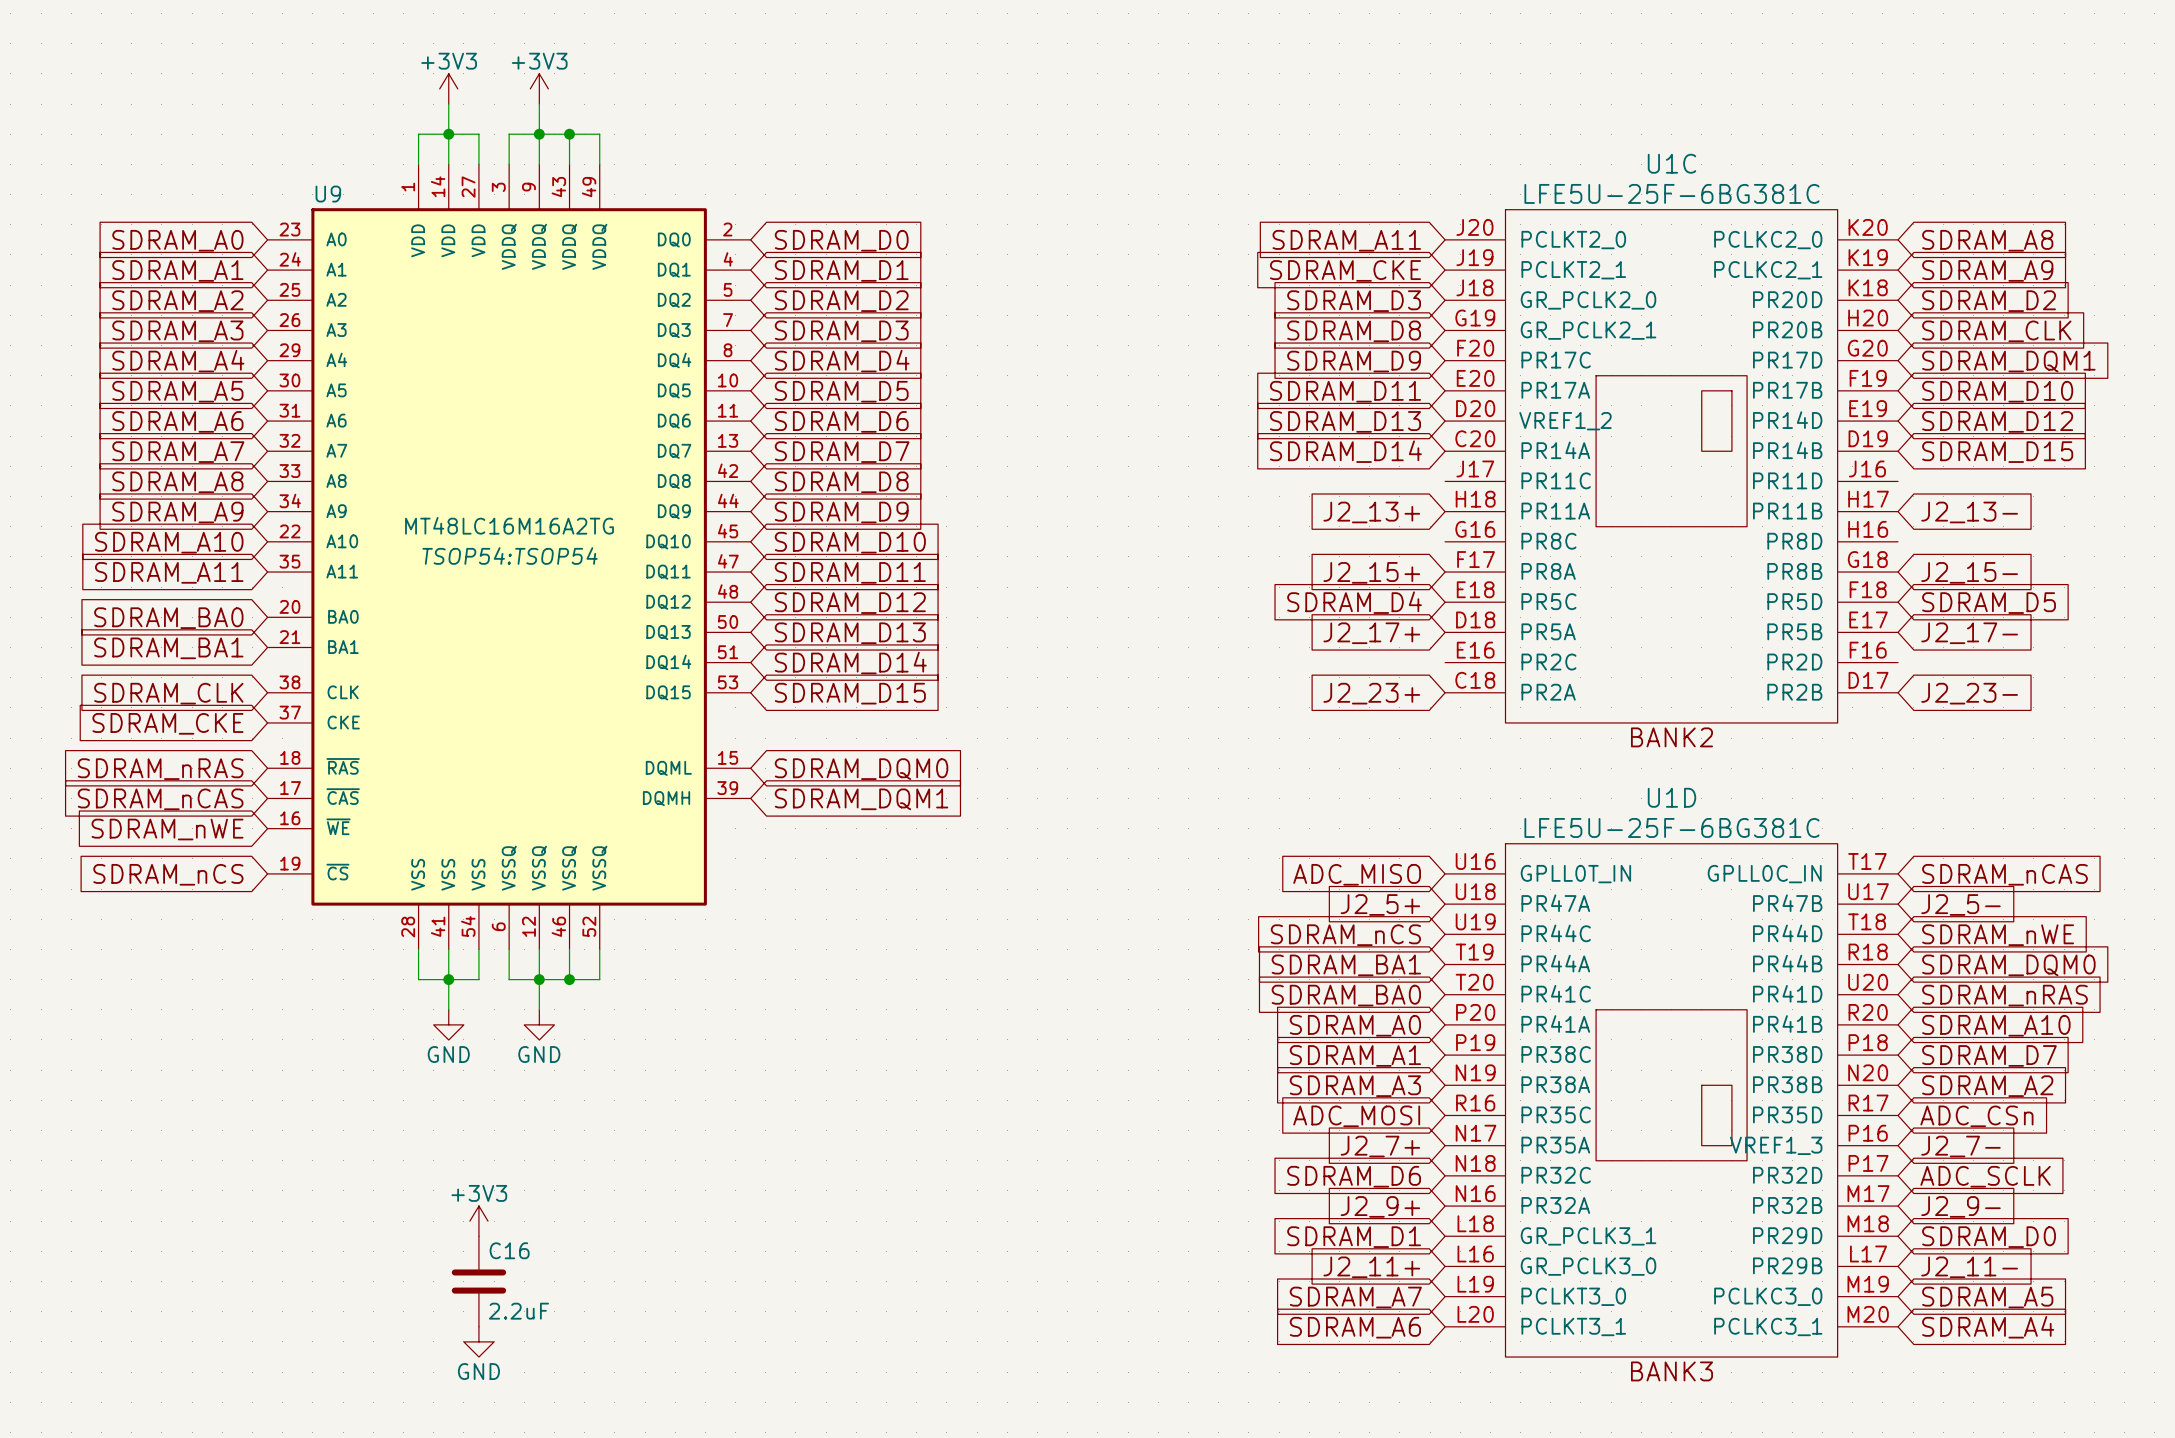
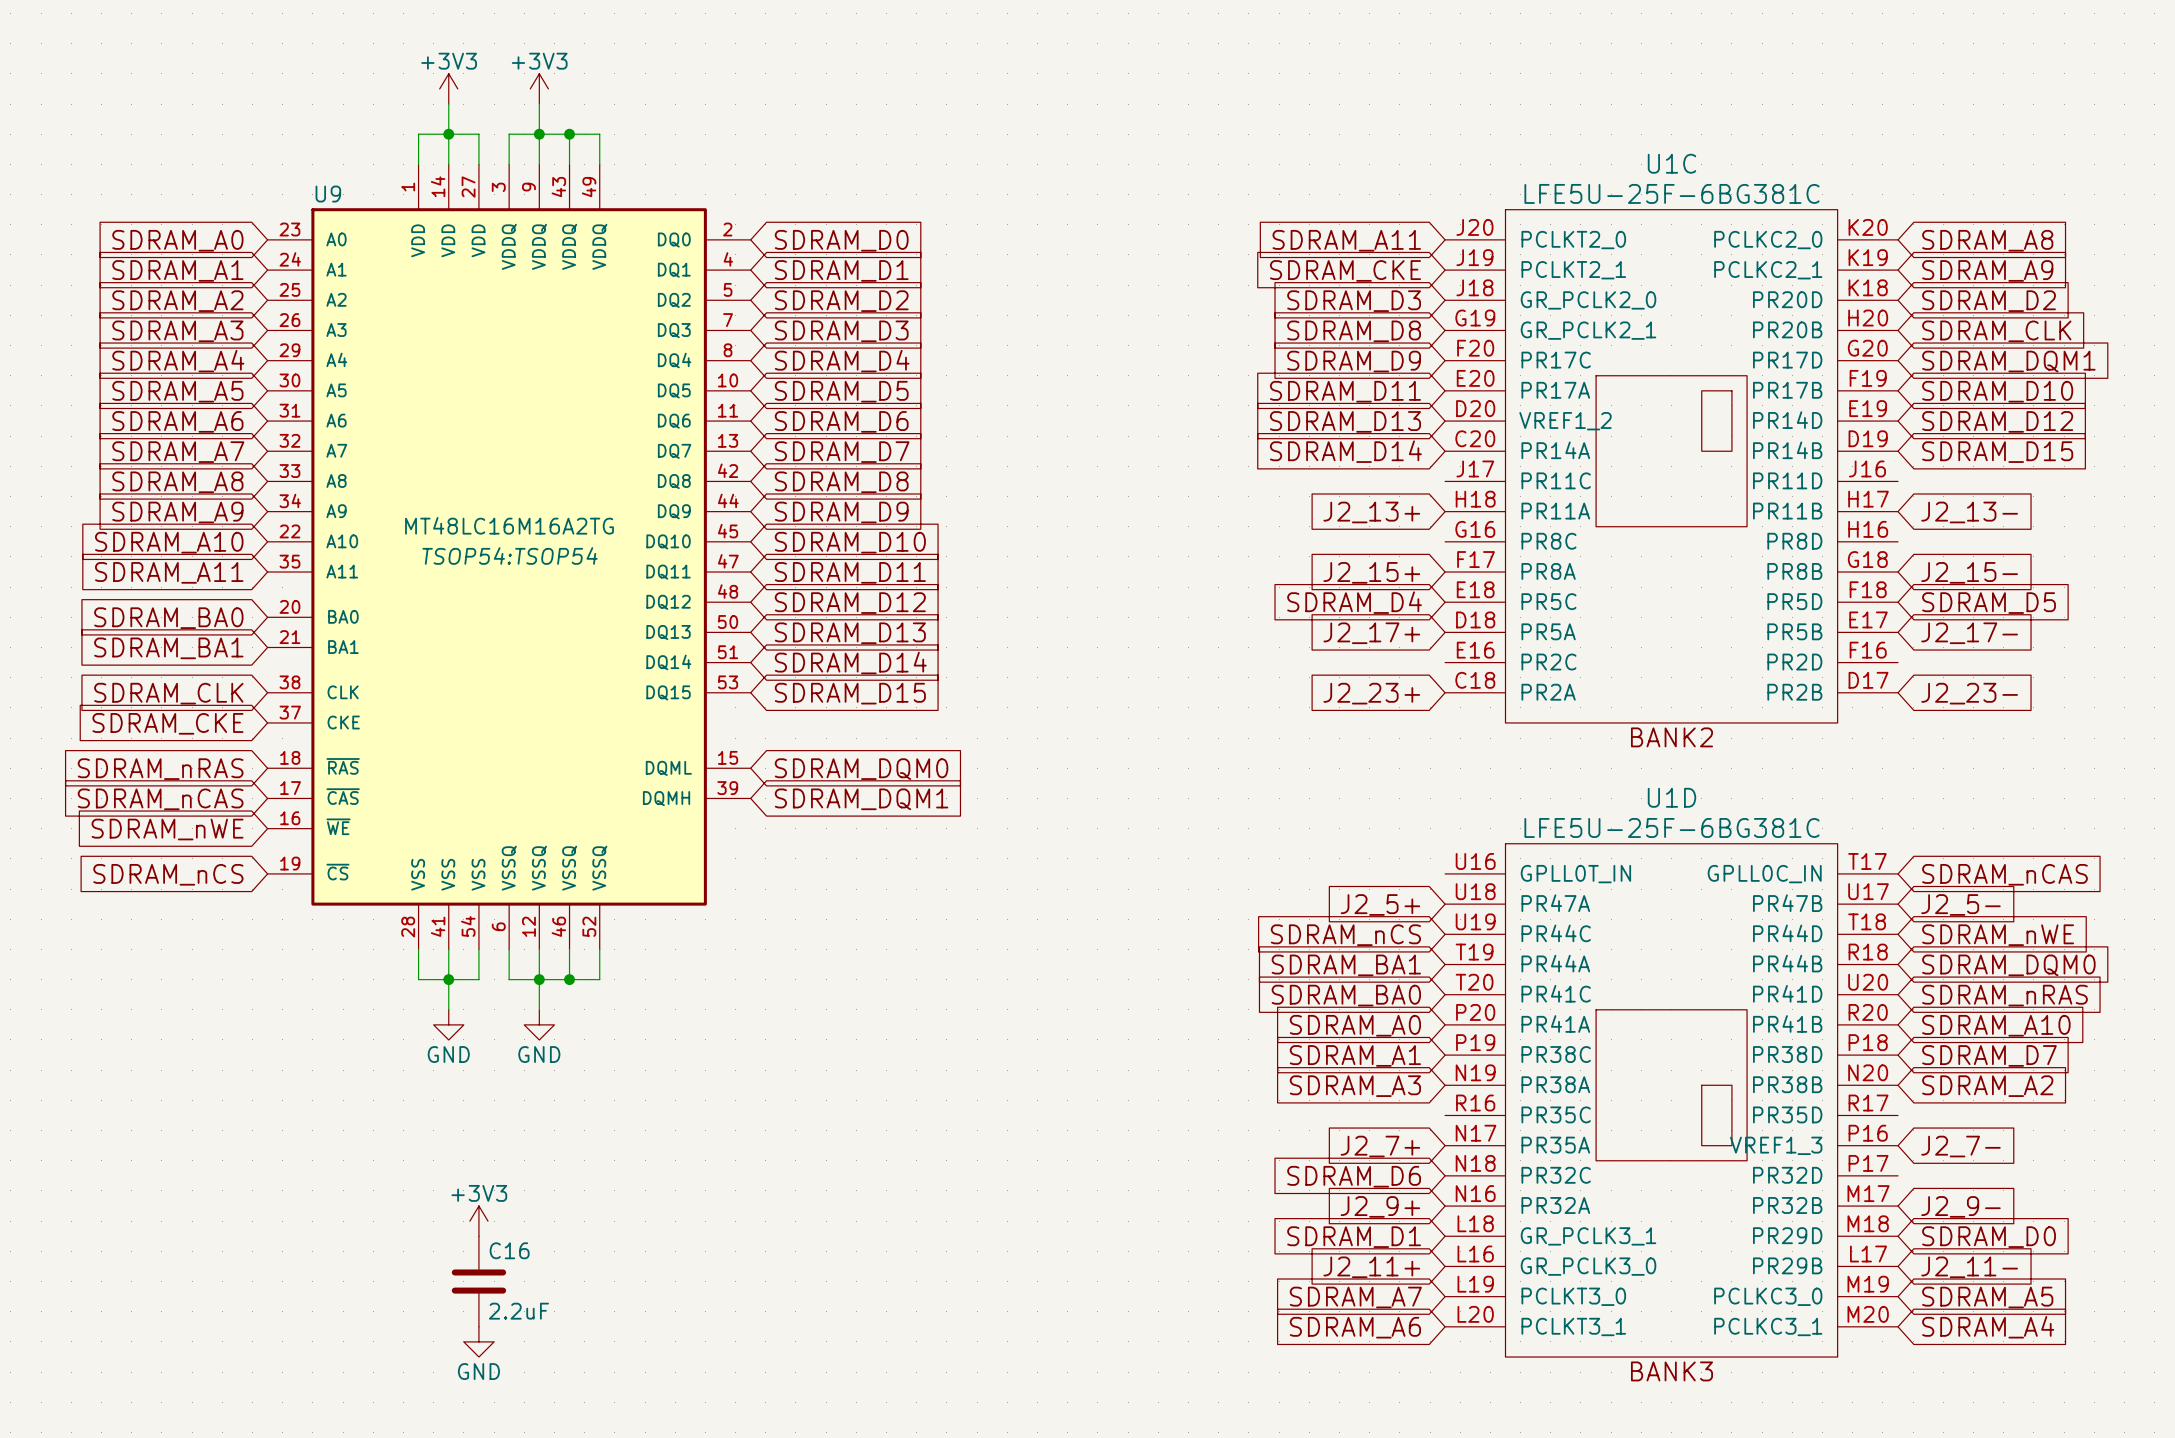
global label: ADC_MISO (1357, 874) -> none
global label: ADC_MOSI (1356, 1116) -> none
global label: ADC_CSn (1976, 1116) -> none
global label: ADC_SCLK (1985, 1176) -> none

